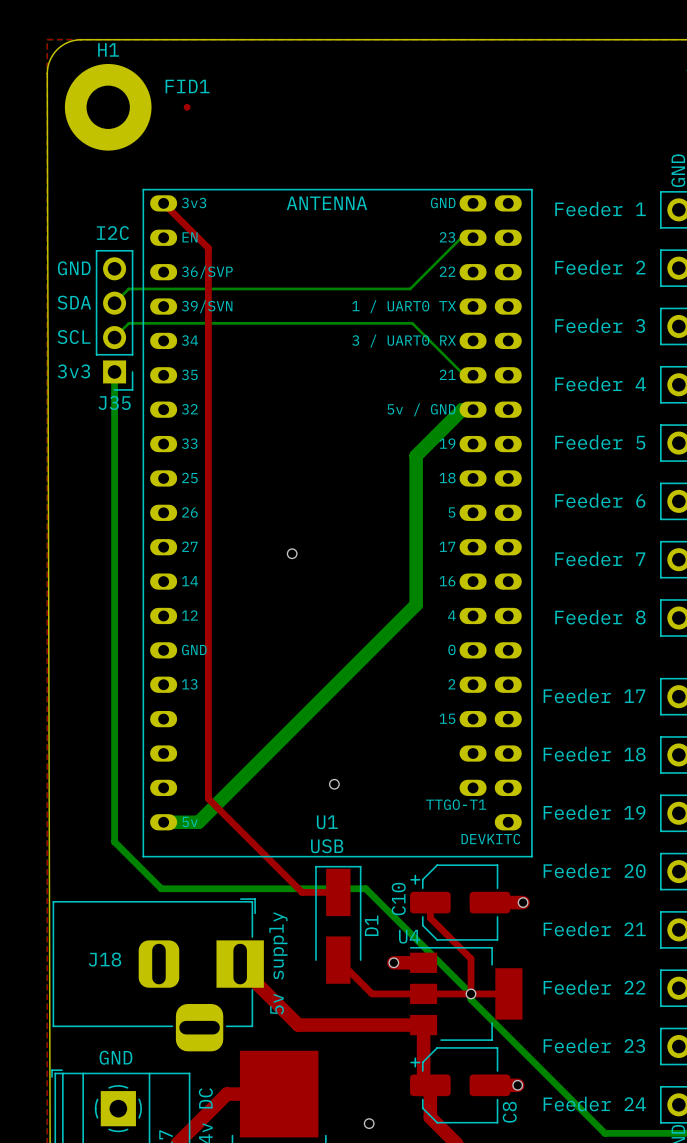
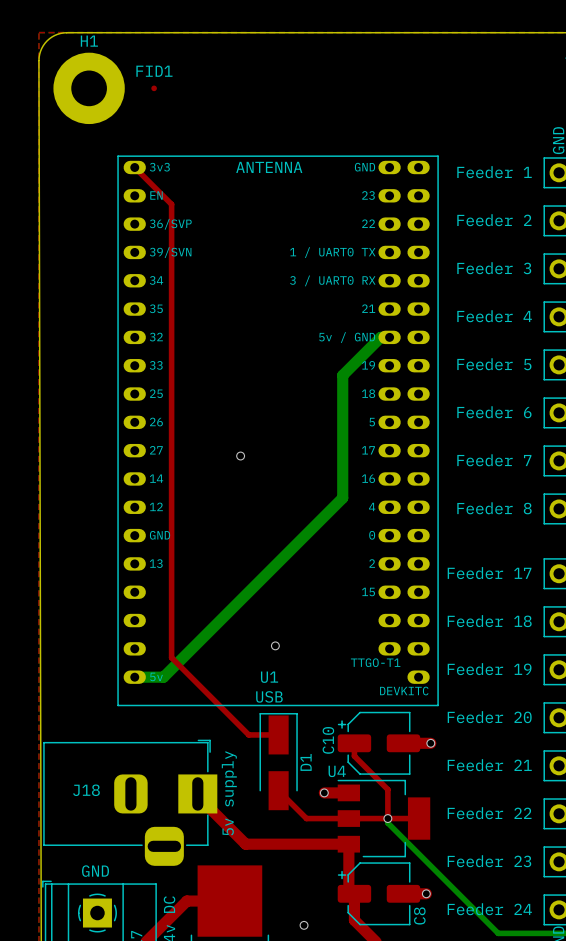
text: I2C (112, 233) -> none
bottom track: (473, 237) (461, 237) (410, 288) (128, 288) (114, 303) -> none
text: GND (74, 268) -> none
text: SDA (74, 302) -> none
J35: (114, 320) -> none
text: SCL (74, 337) -> none
bottom track: (114, 337) (128, 323) (412, 323) (464, 375) (473, 375) -> none
text: 3v3 (73, 371) -> none
bottom track: (114, 371) (114, 841) (161, 888) (365, 888) (470, 993) -> none

